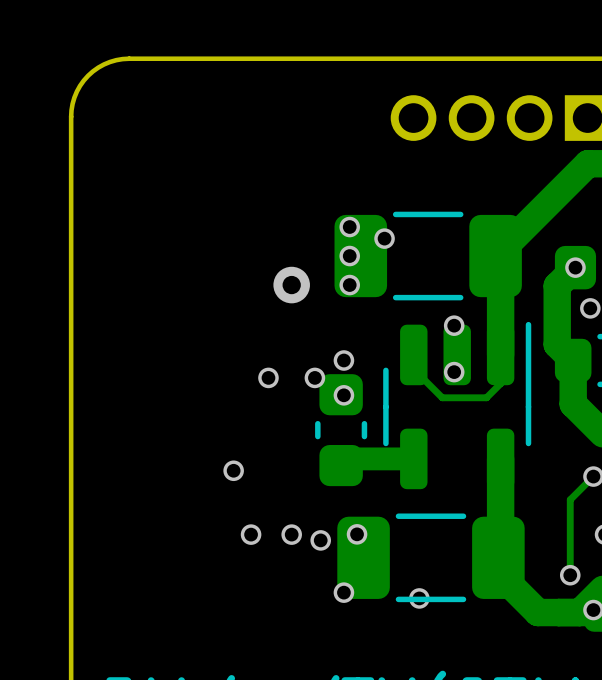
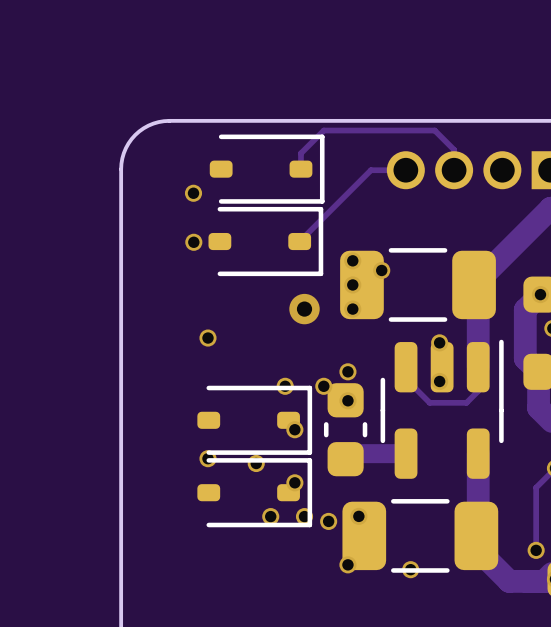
part: none -> (267, 169)
track: none -> (300, 169) (300, 153) (323, 130) (434, 130) (454, 149) (454, 170)
track: none -> (405, 170) (370, 170) (299, 241)
via: none -> (193, 193)
part: none -> (265, 241)
via: none -> (193, 242)
via: none -> (207, 338)
part: none -> (254, 420)
via: none -> (294, 429)
via: none -> (207, 458)
via: none -> (294, 482)
part: none -> (254, 492)

